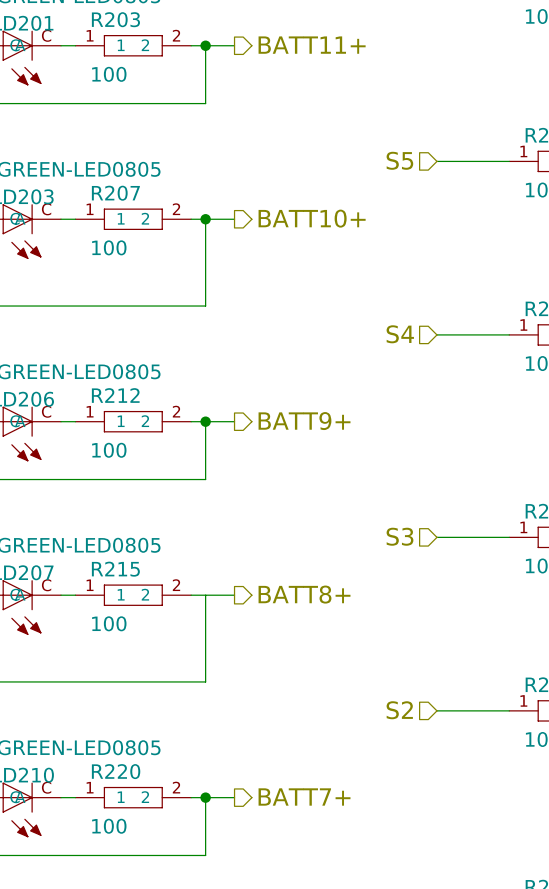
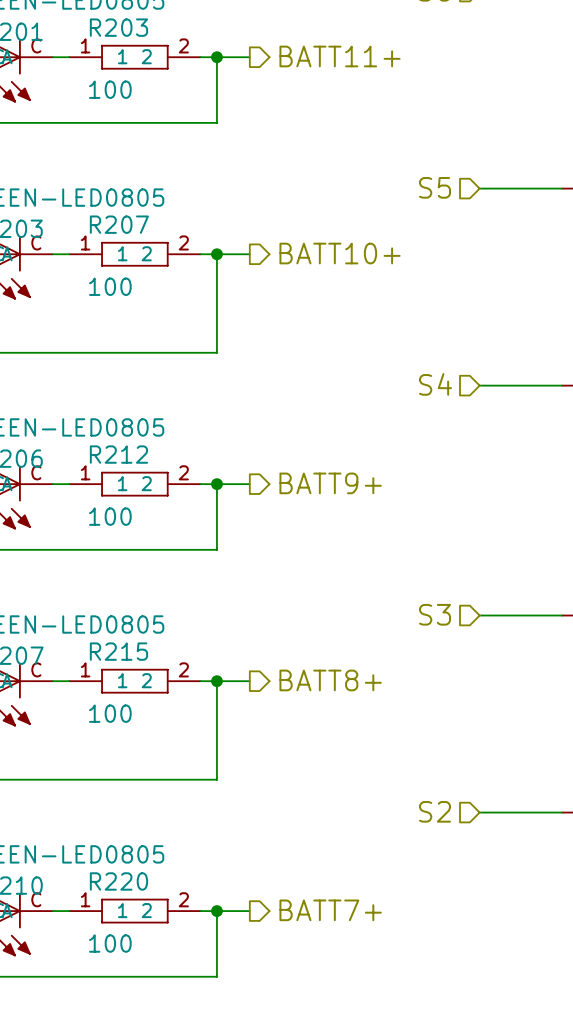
junction: none -> (216, 681)

